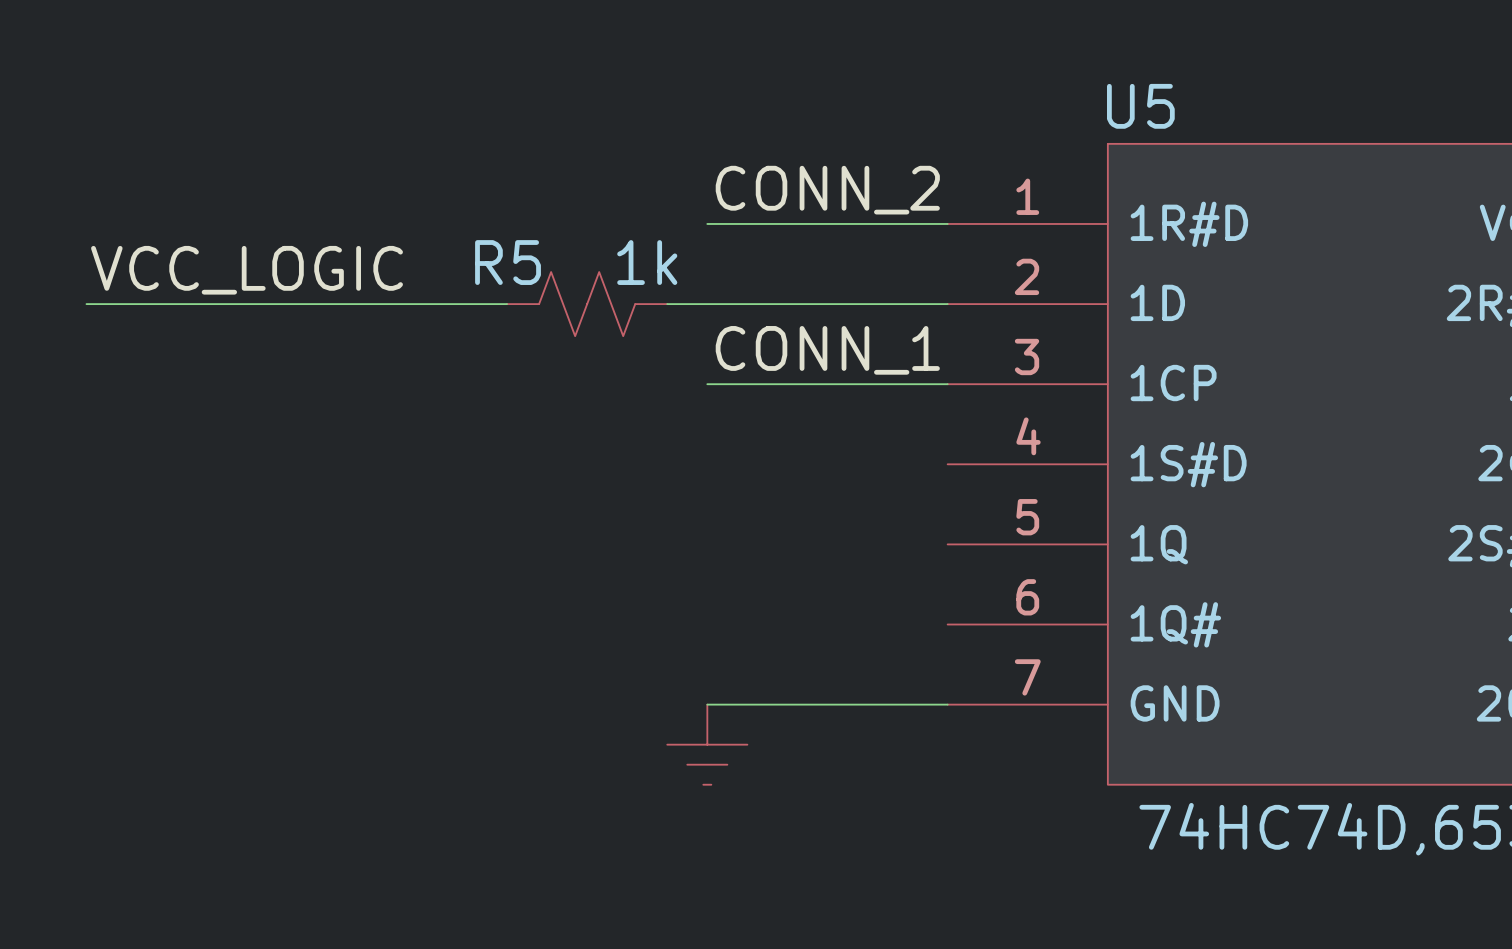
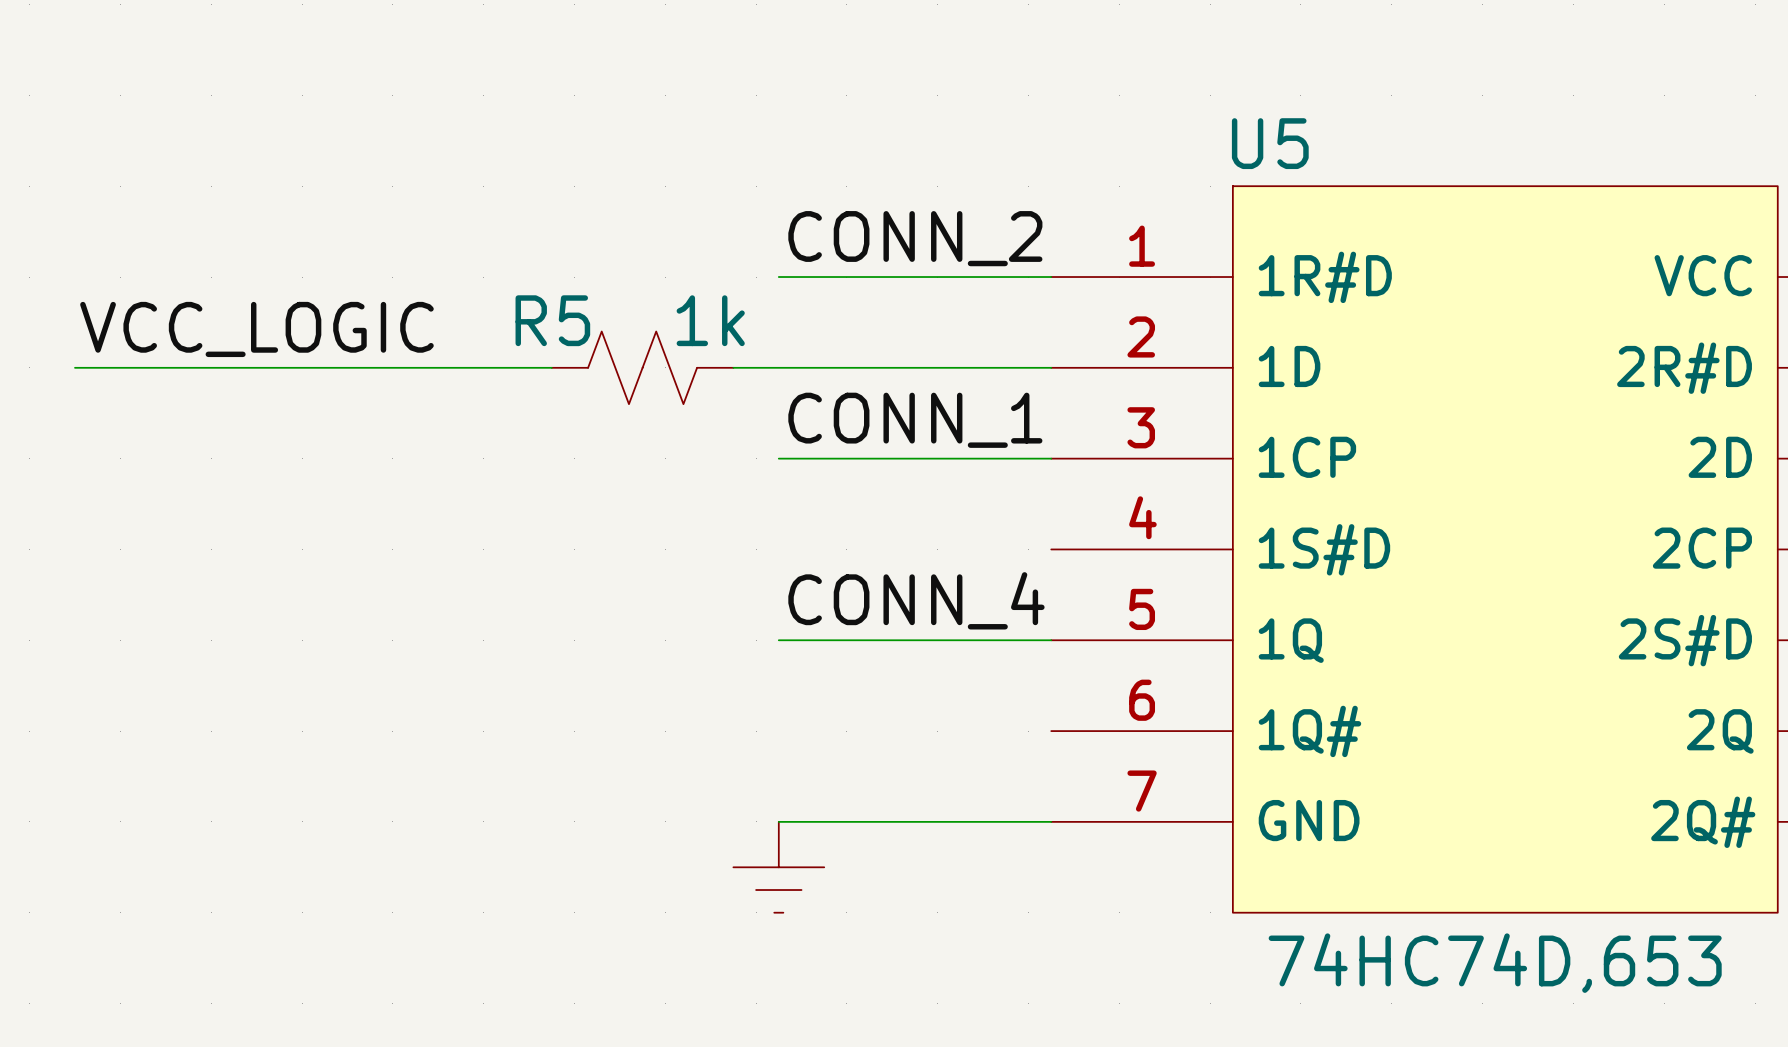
label: none -> CONN_4 (916, 600)
wire: none -> (778, 640) (1051, 640)

